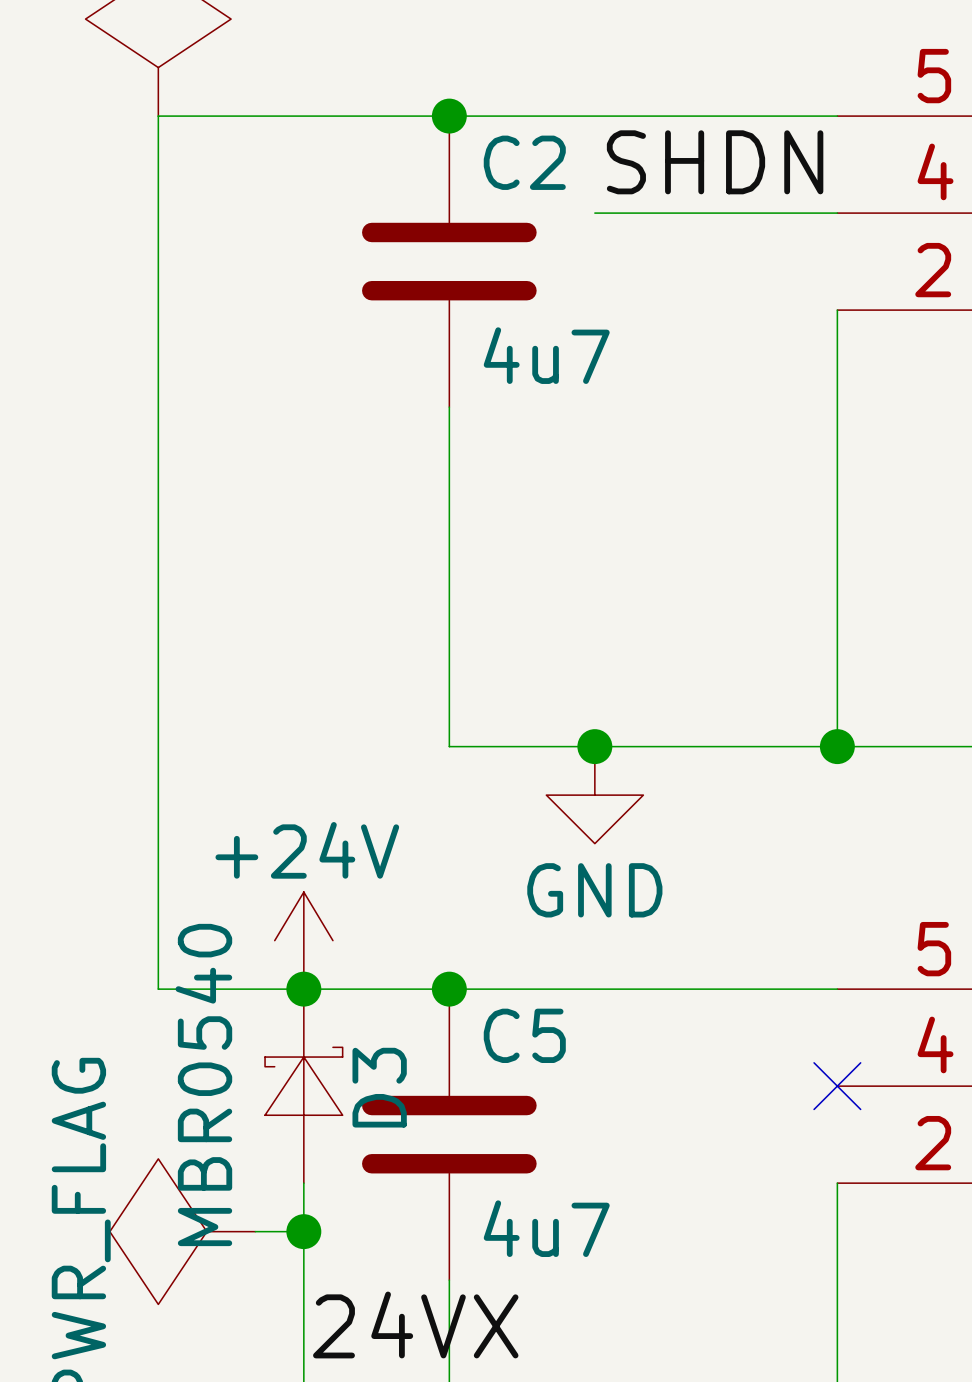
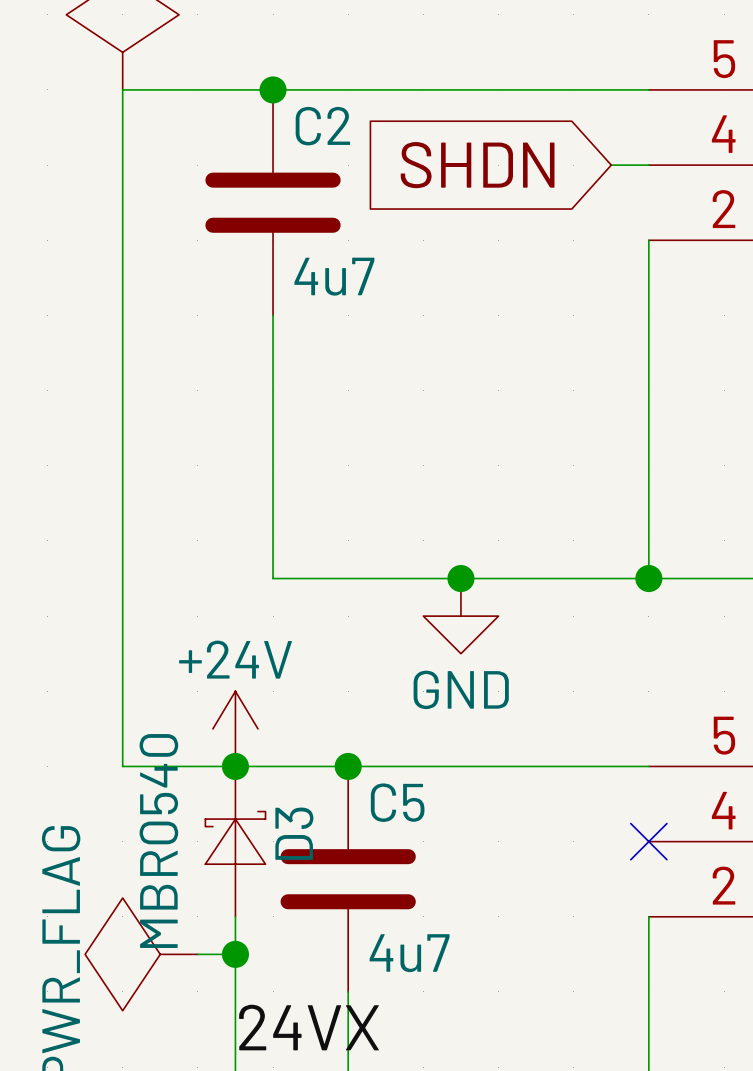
junction position: (449, 116) -> (273, 89)
label: SHDN (715, 162) -> none
wire: (594, 213) (788, 213) -> none
global label: none -> SHDN (477, 165)
C2 position: (449, 261) -> (273, 202)
wire: (449, 407) (449, 746) -> (273, 315) (273, 578) (348, 578)

